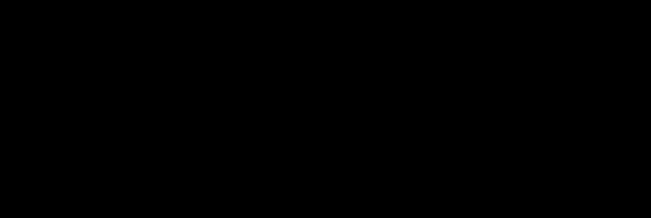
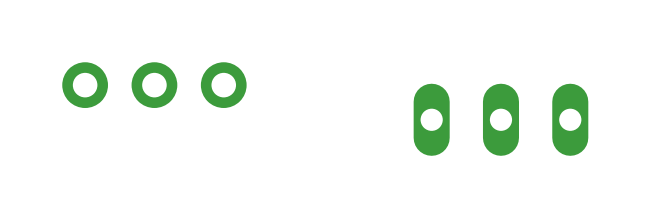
part: none -> (154, 85)
part: none -> (500, 119)

